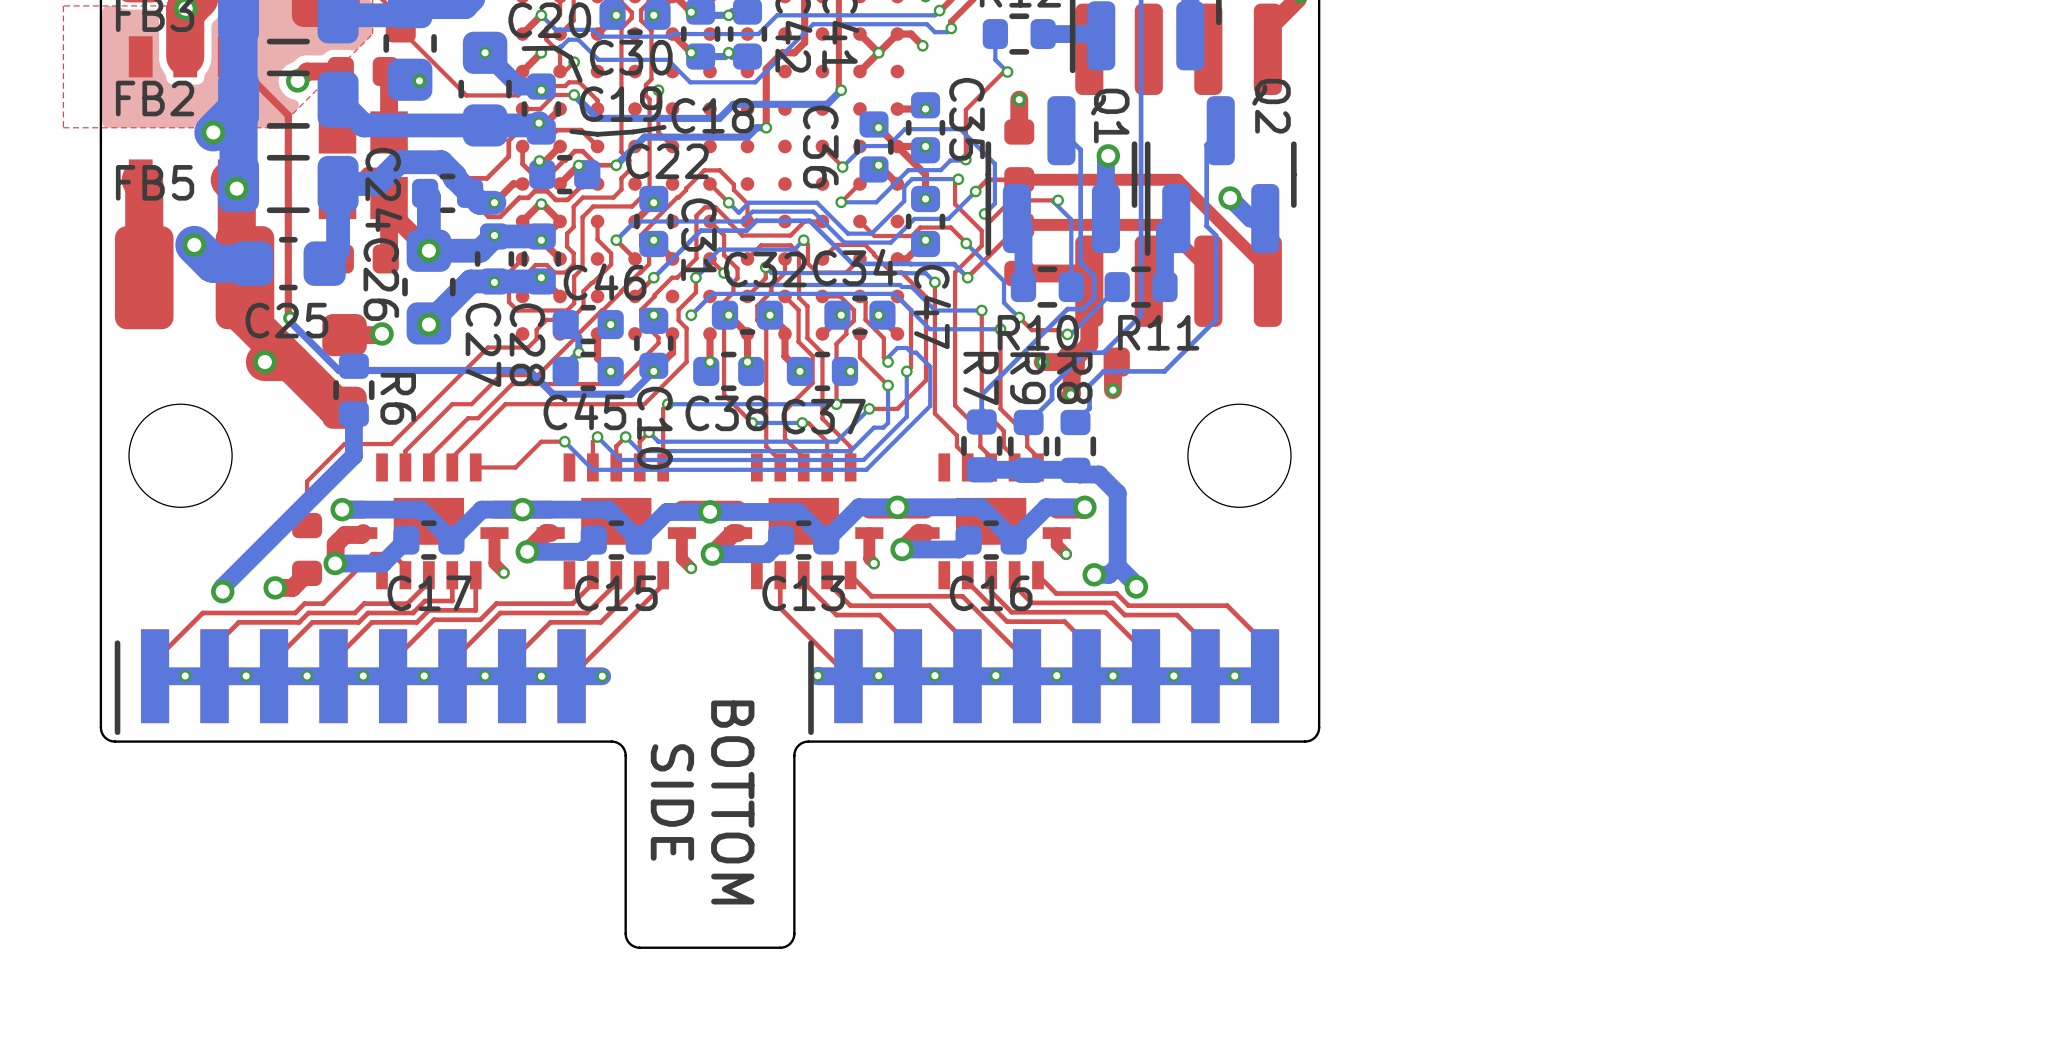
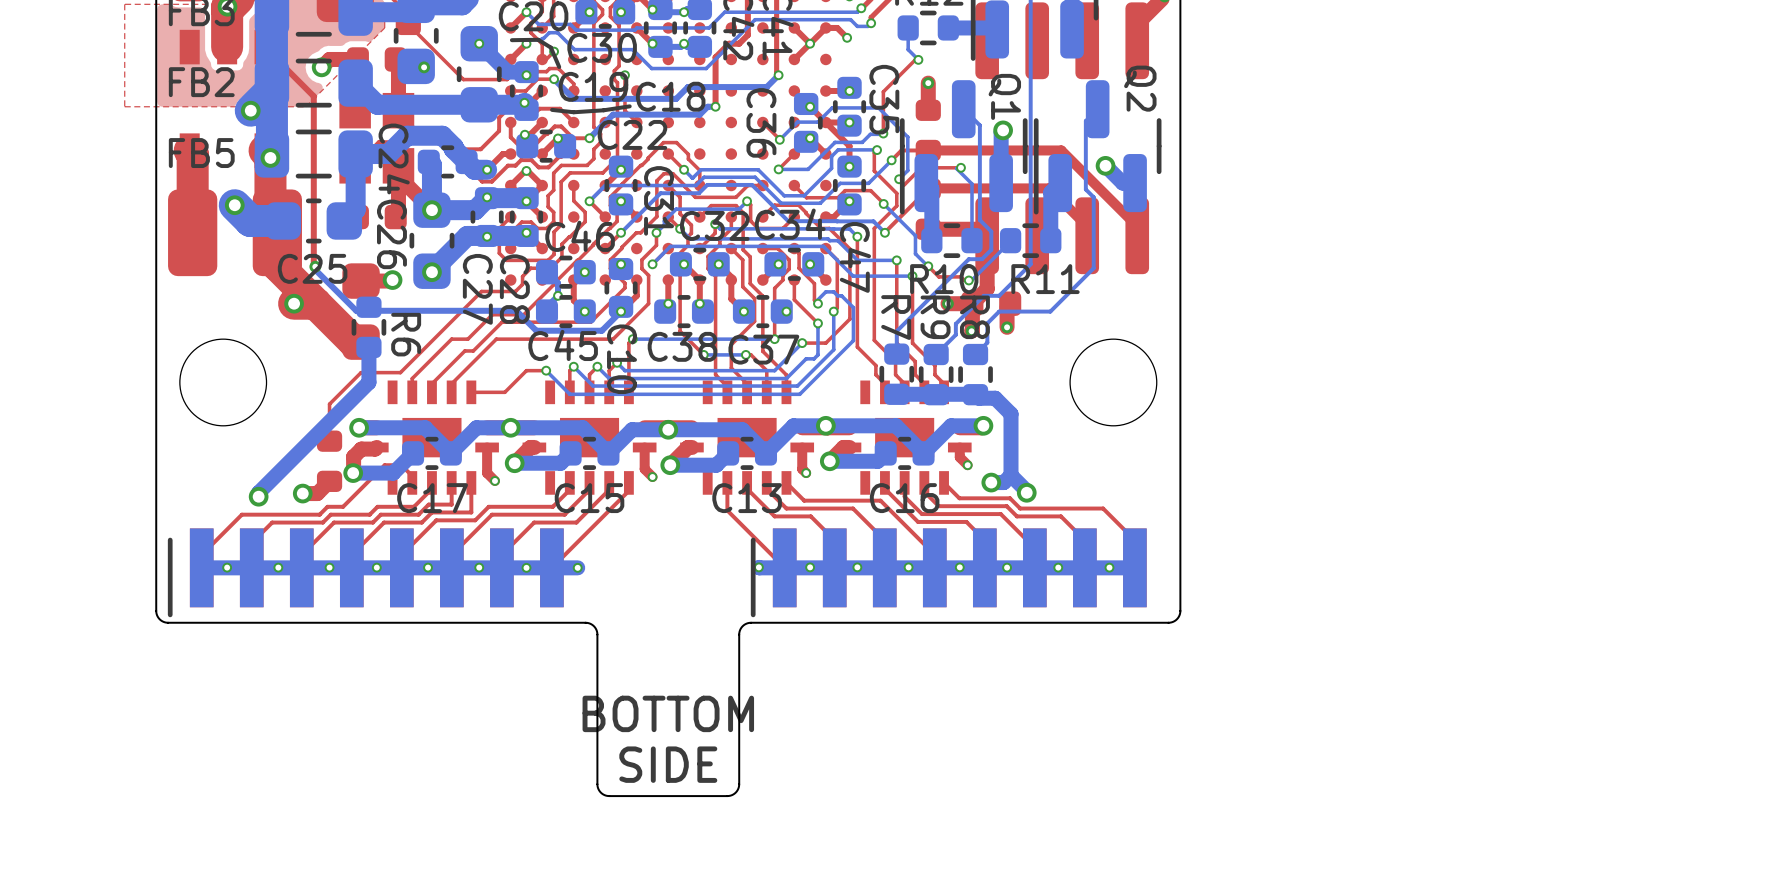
text rotation: 0° (672, 802) -> 90° counterclockwise (668, 764)
text rotation: 0° (732, 802) -> 90° counterclockwise (668, 713)

